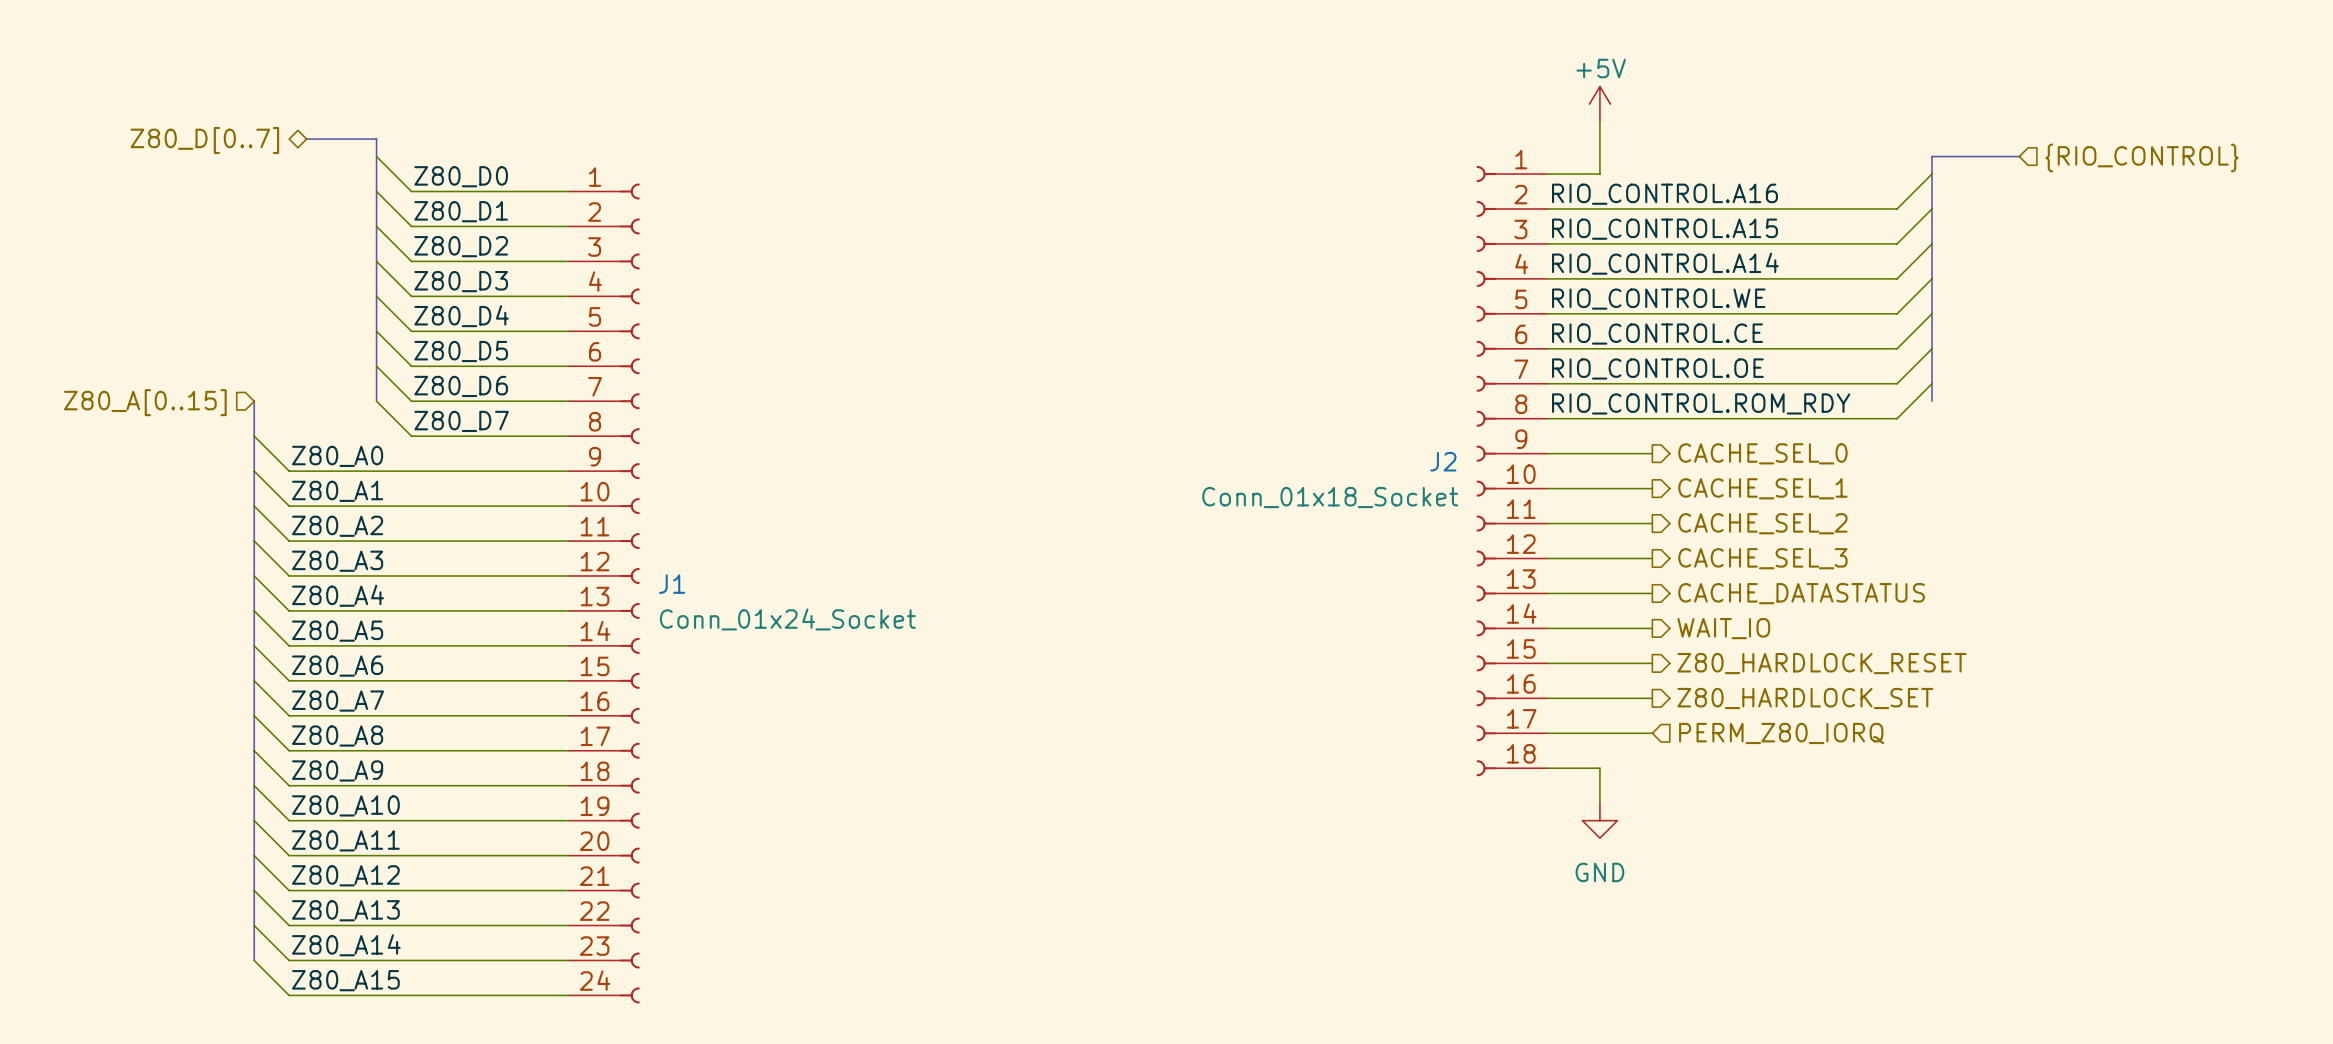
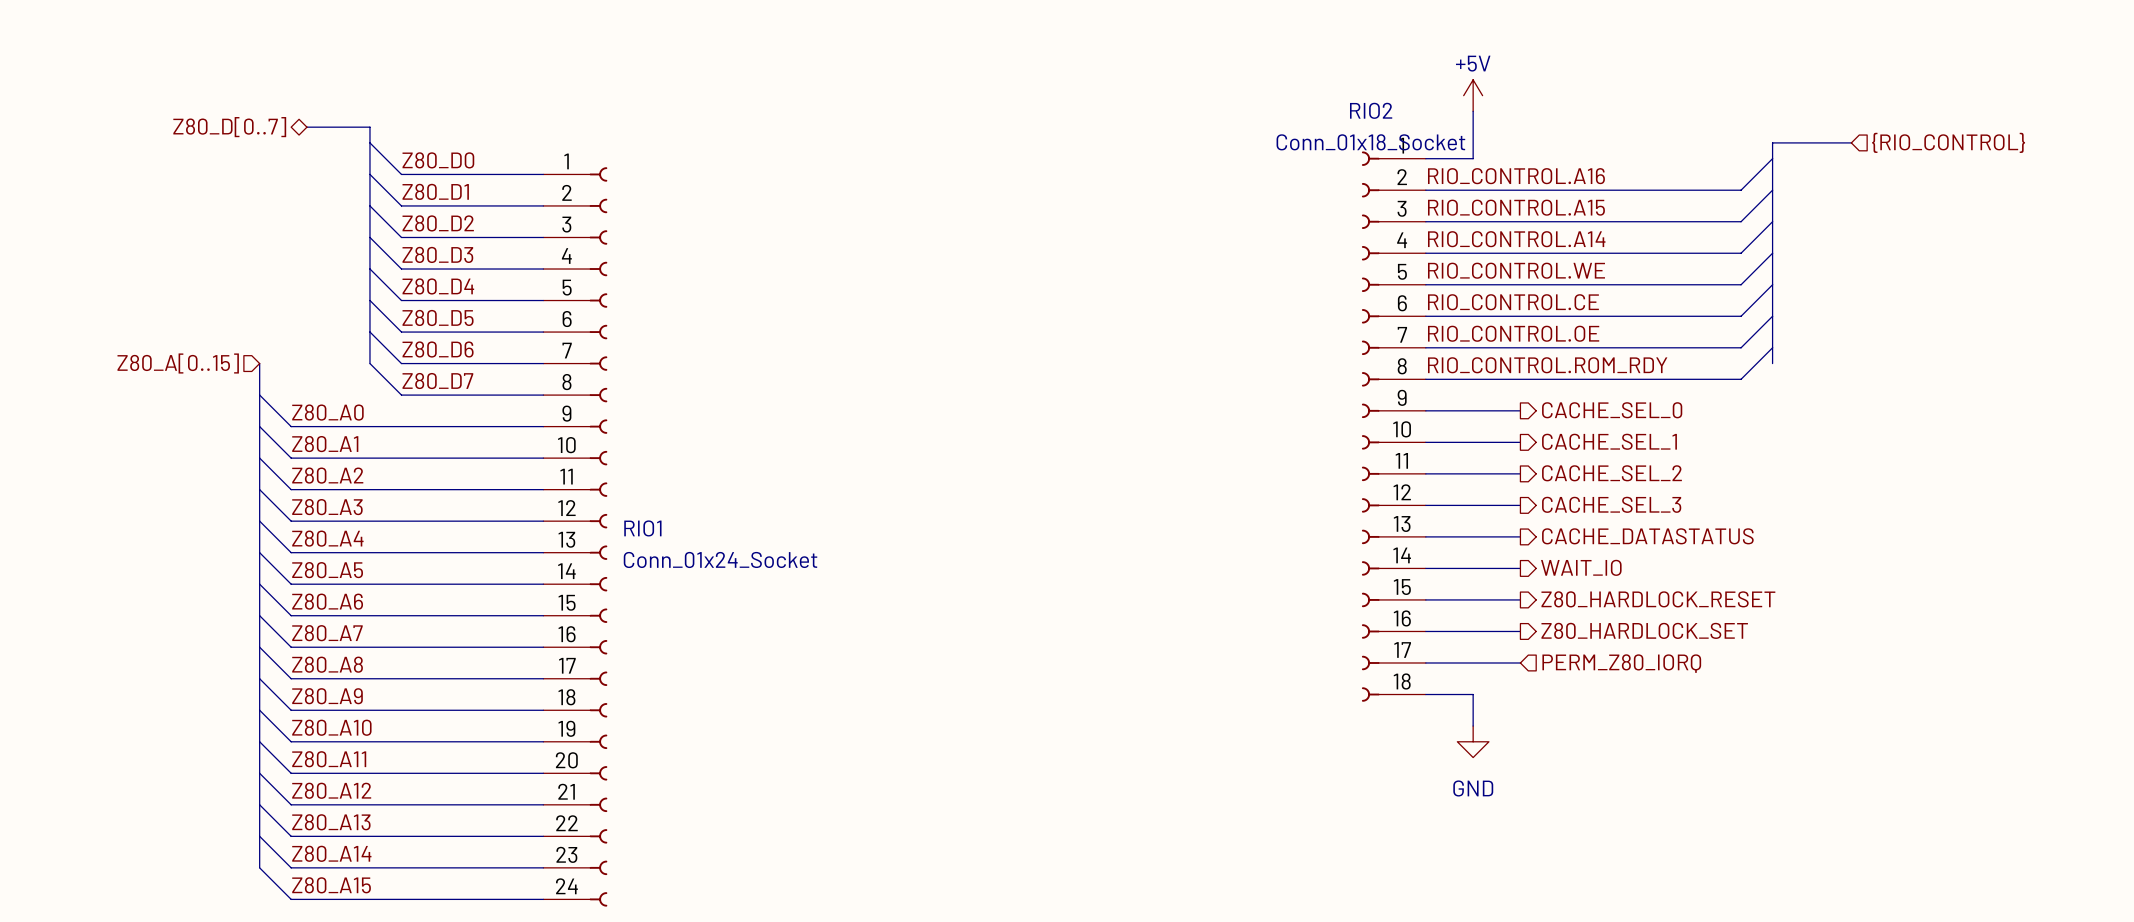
J2 name: J2 (1443, 461) -> RIO2 (1371, 110)
J2 value position: Conn_01x18_Socket (1330, 497) -> Conn_01x18_Socket (1370, 142)
J1 name: J1 (672, 584) -> RIO1 (642, 528)

